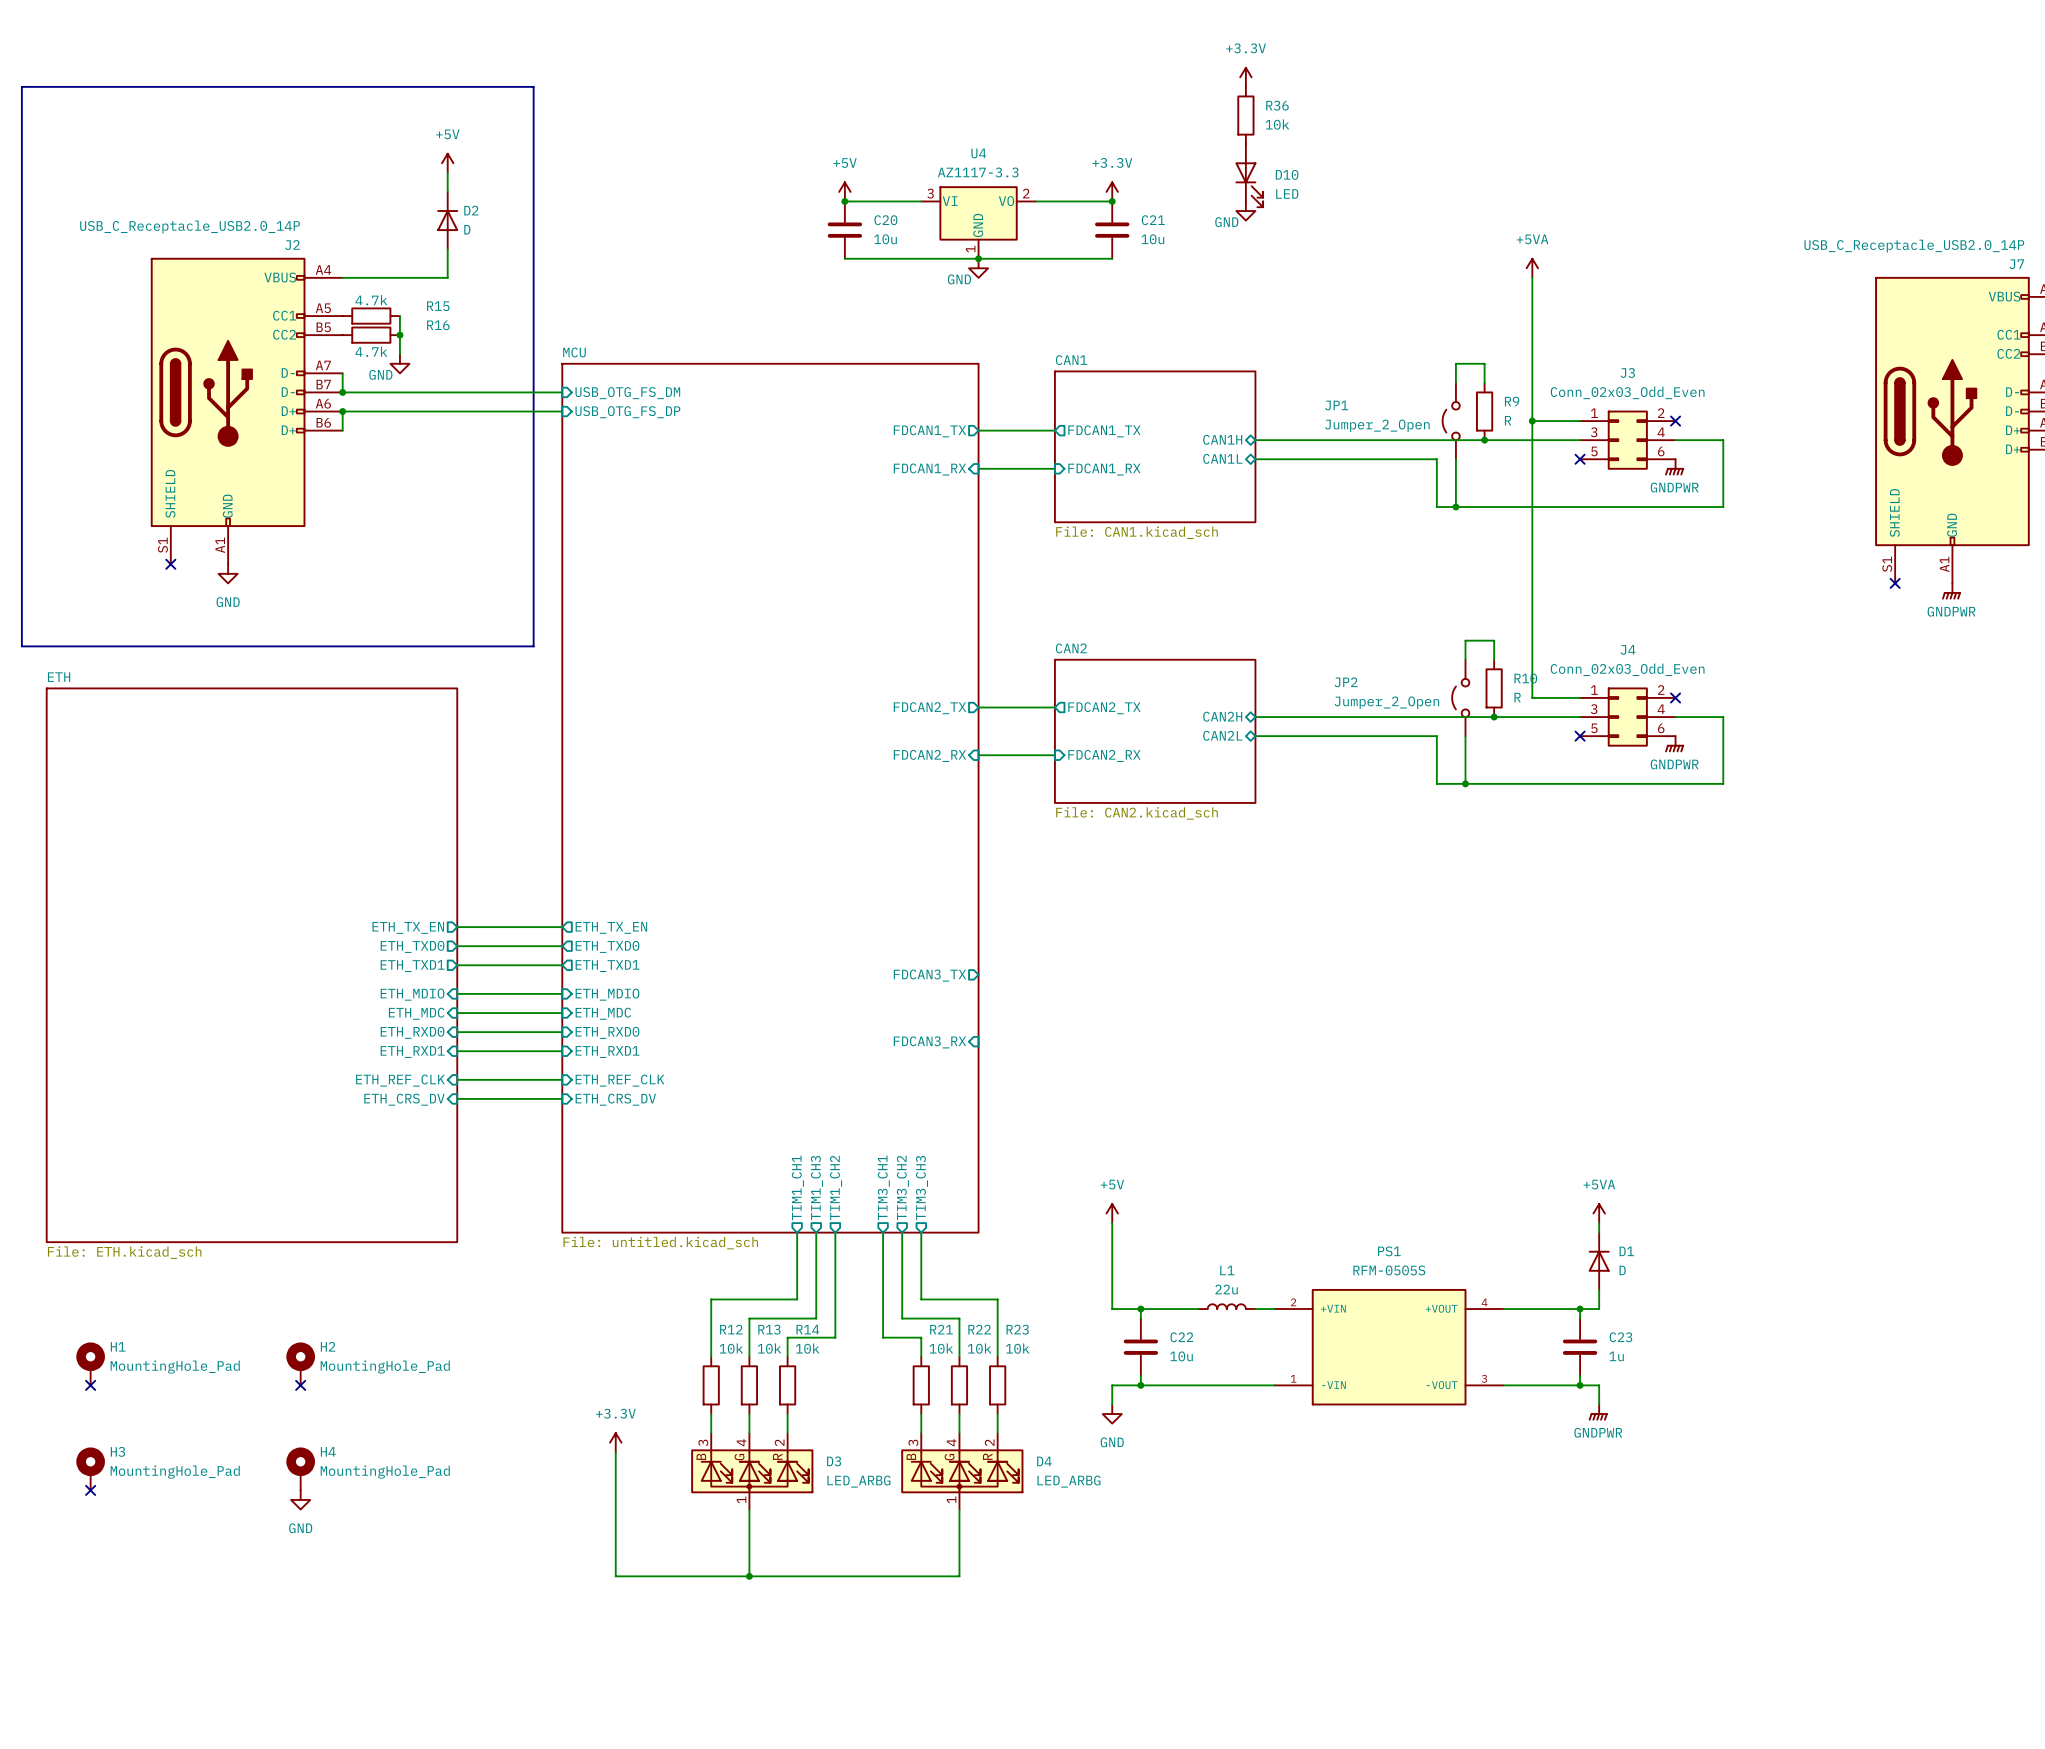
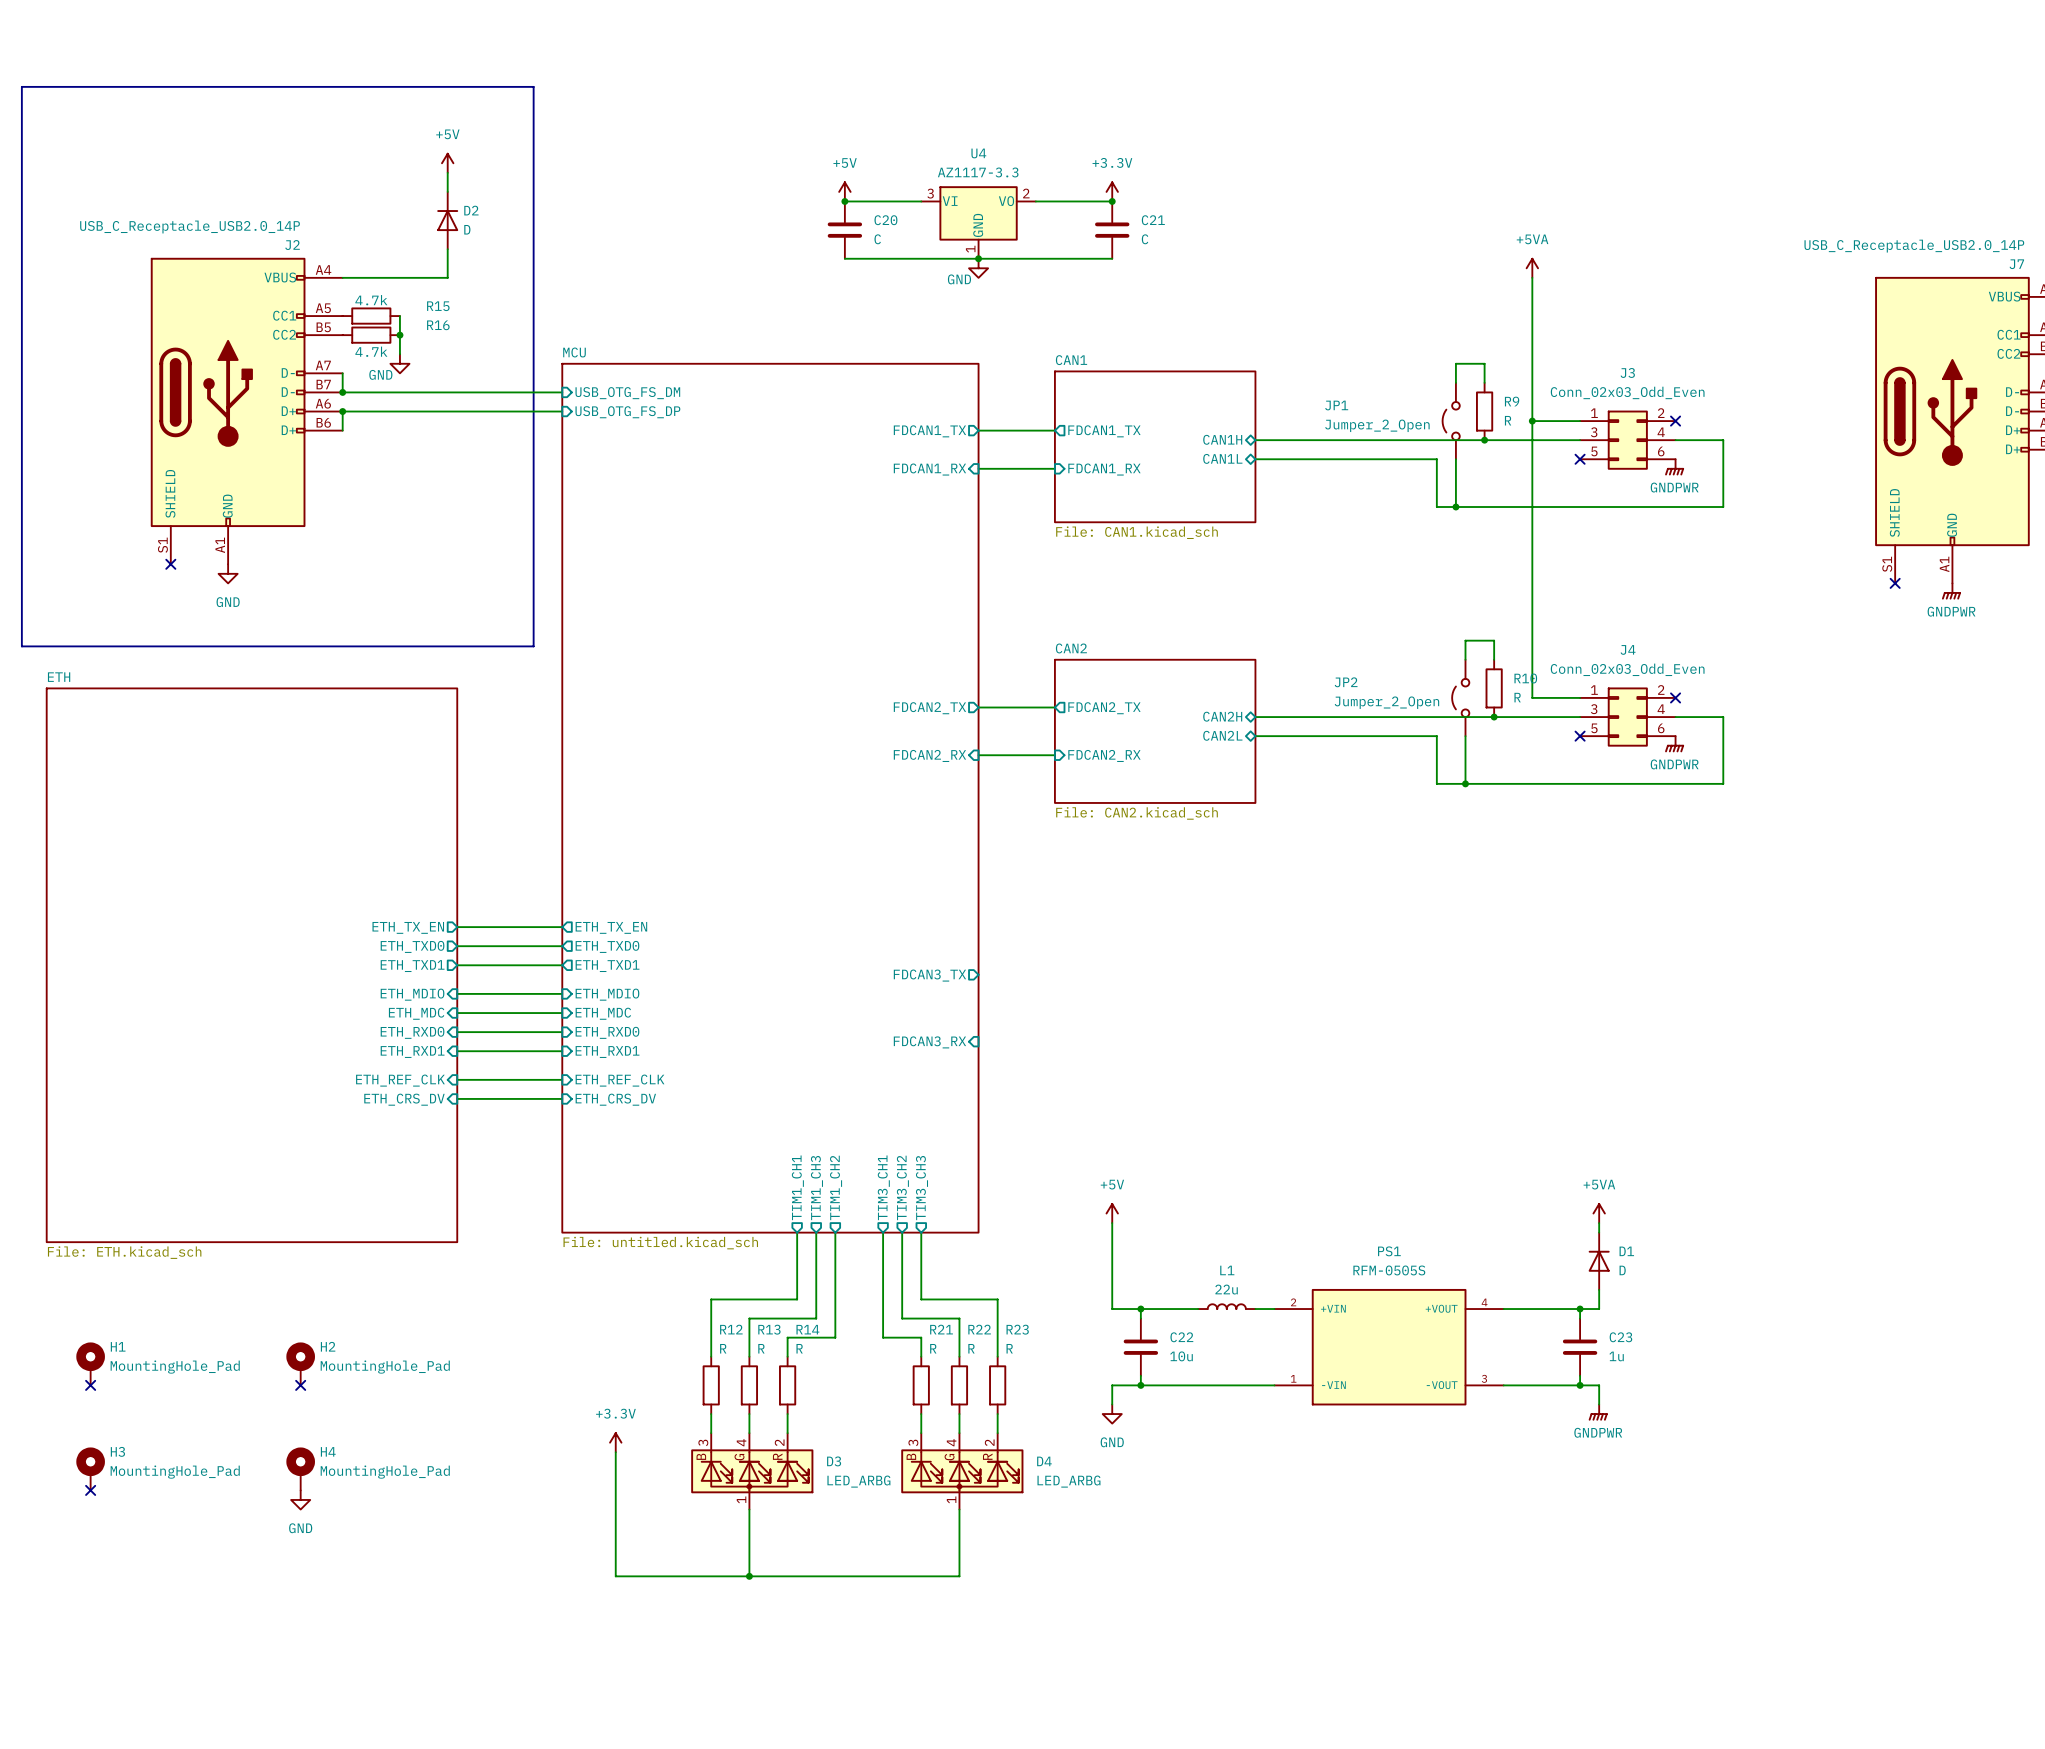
power symbol: +3.3V (1245, 77) -> none
R36: 10k (1245, 115) -> none
D10: LED (1249, 175) -> none
power symbol: GND (1245, 211) -> none
C20 value: 10u (885, 239) -> C (877, 239)
C21 value: 10u (1152, 239) -> C (1145, 239)
R12 value: 10k (731, 1348) -> R (723, 1348)
R13 value: 10k (769, 1348) -> R (761, 1348)
R14 value: 10k (807, 1348) -> R (799, 1348)
R21 value: 10k (941, 1348) -> R (933, 1348)
R22 value: 10k (979, 1348) -> R (971, 1348)
R23 value: 10k (1017, 1348) -> R (1009, 1348)

